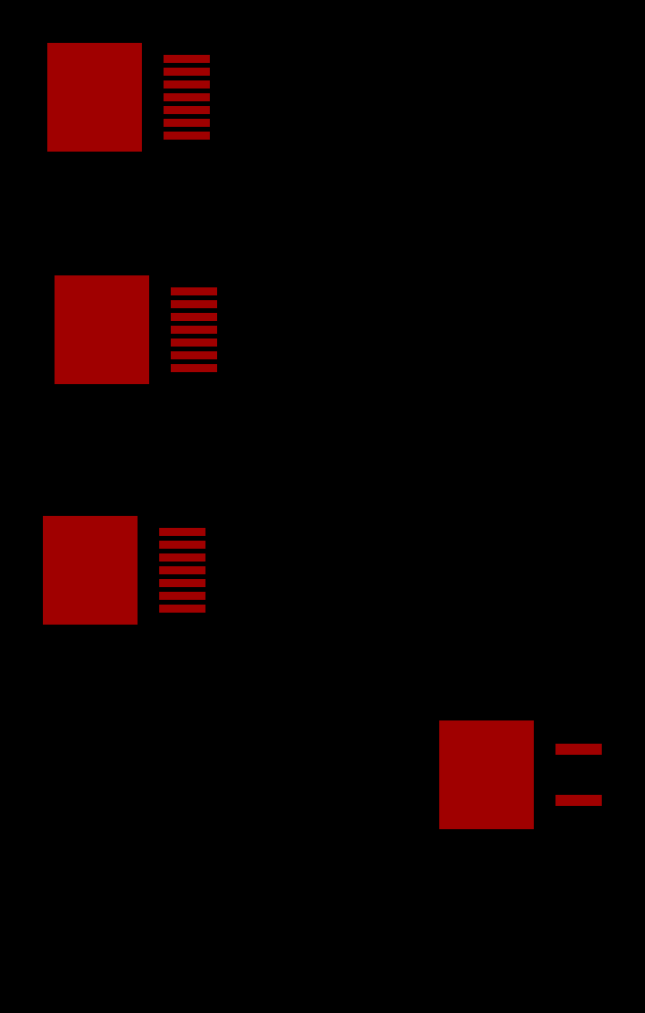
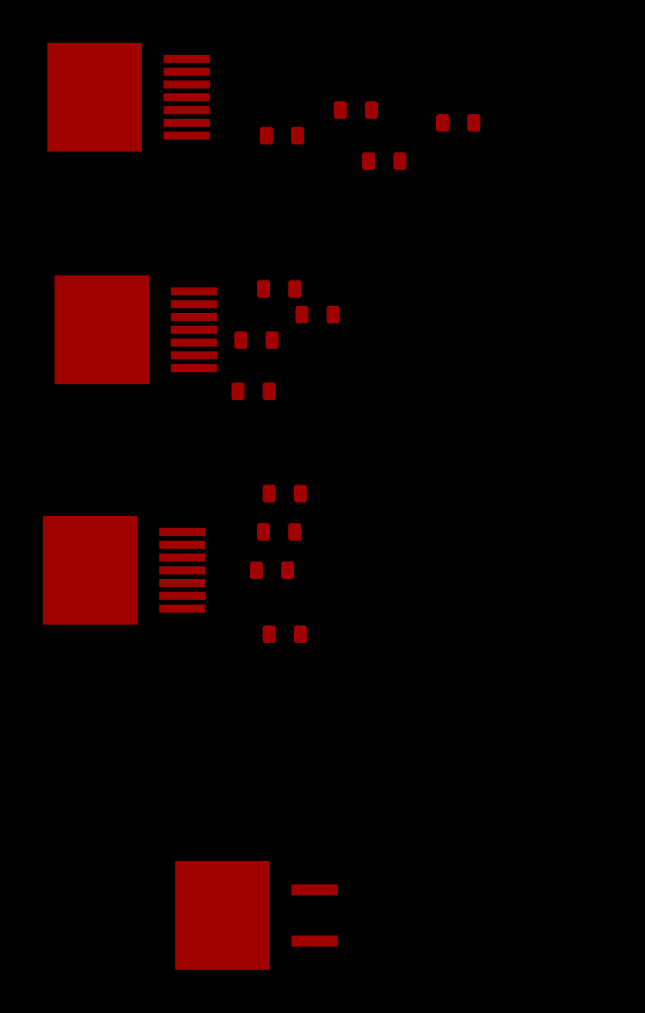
part: none -> (355, 110)
part: none -> (458, 122)
part: none -> (281, 135)
part: none -> (384, 161)
part: none -> (279, 289)
part: none -> (317, 314)
part: none -> (256, 340)
part: none -> (253, 391)
part: none -> (284, 493)
part: none -> (279, 531)
part: none -> (272, 570)
part: none -> (284, 634)
part: (520, 774) -> none
part: none -> (256, 915)

